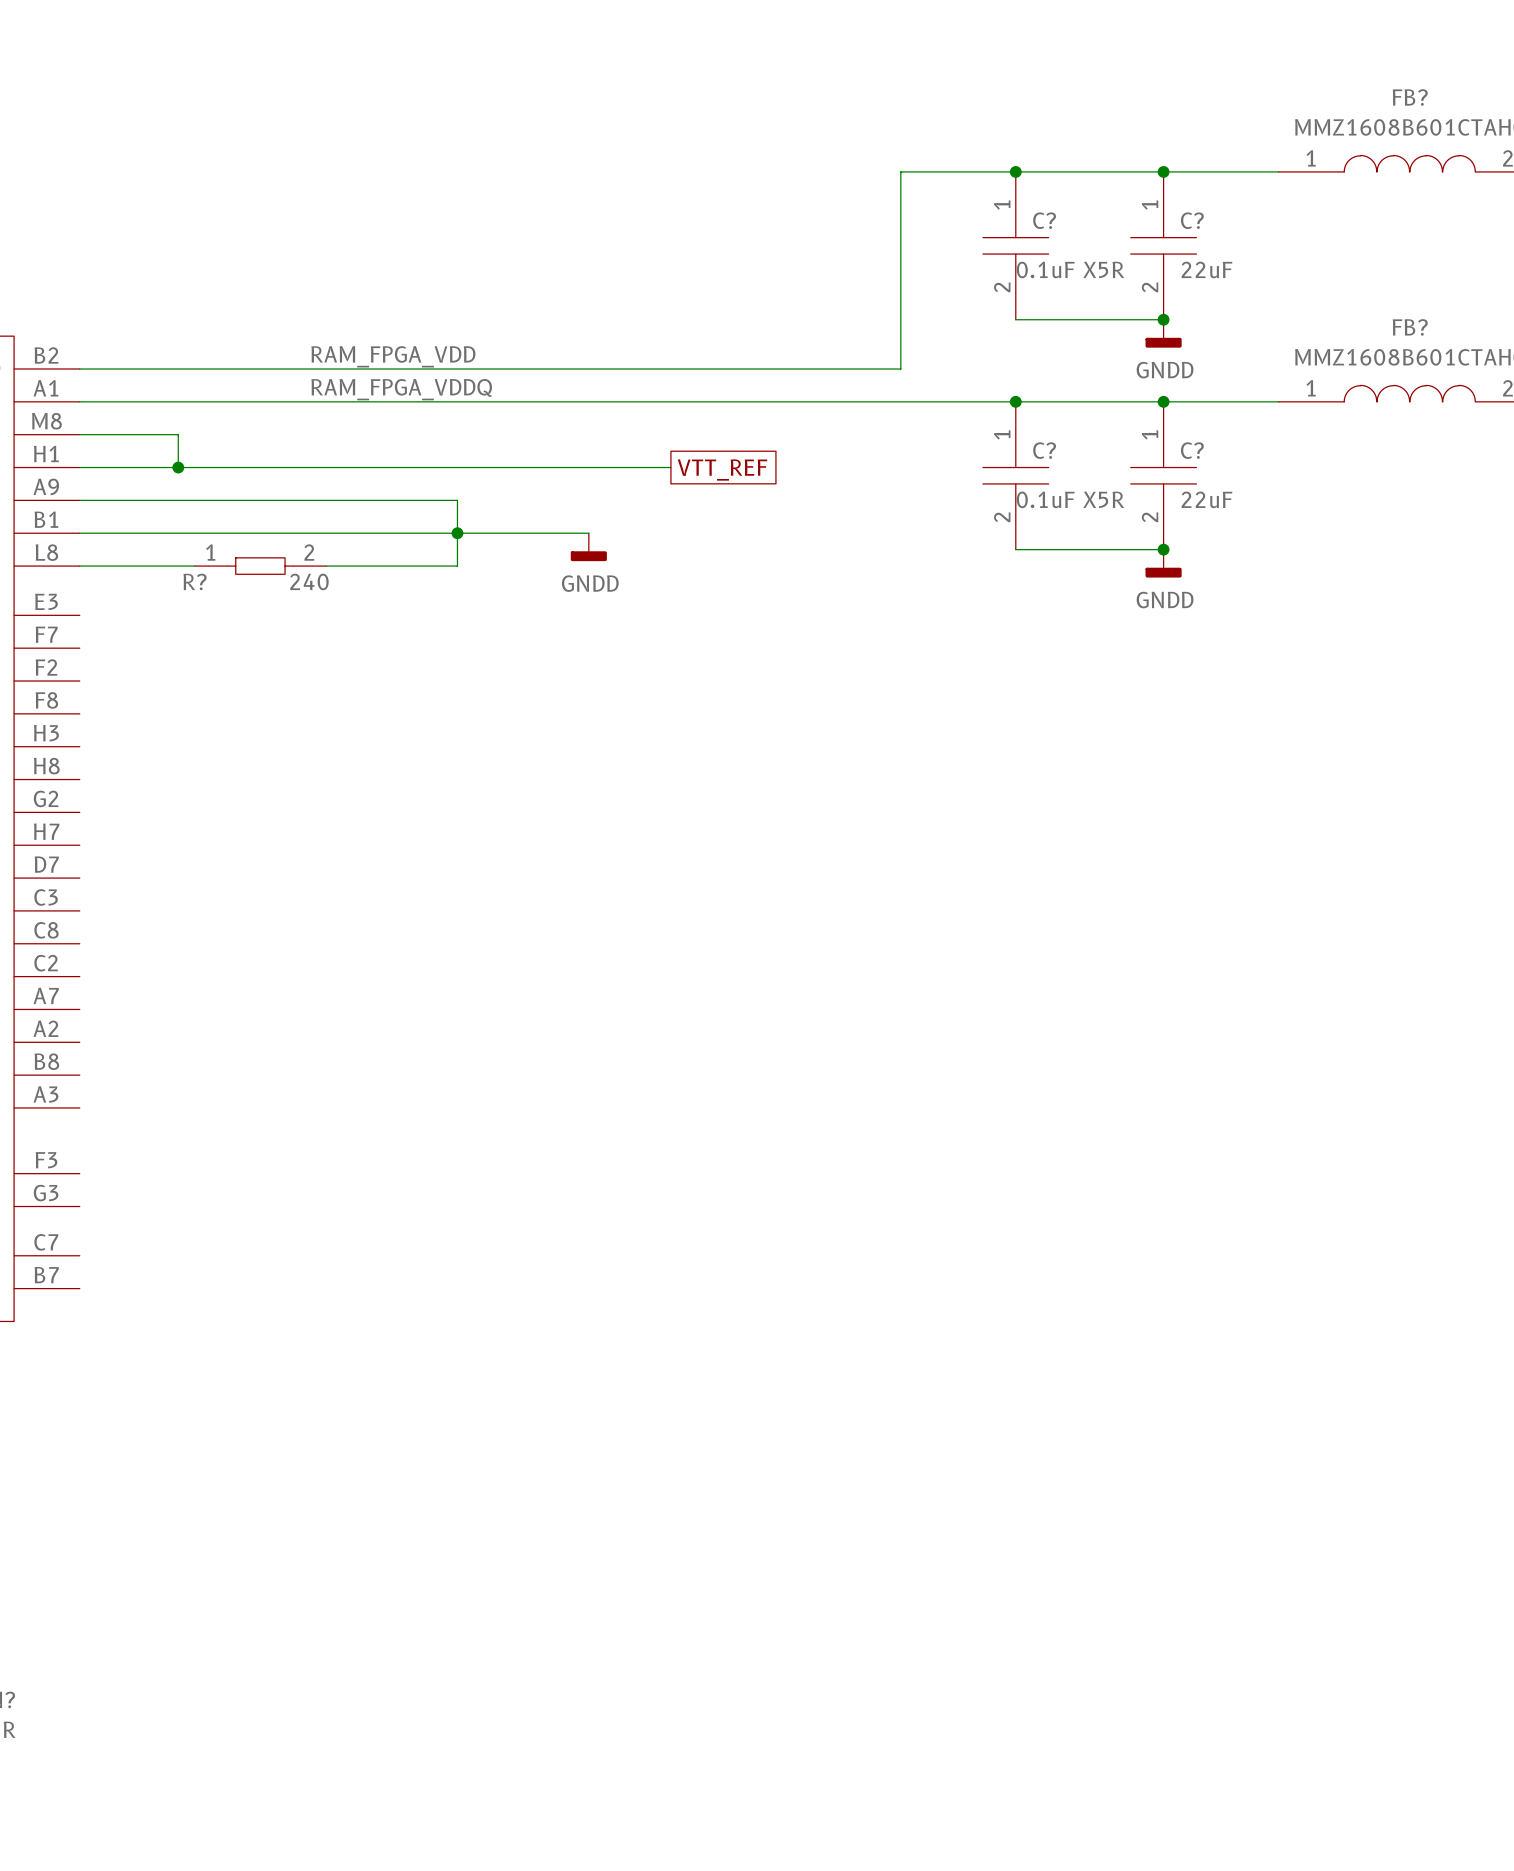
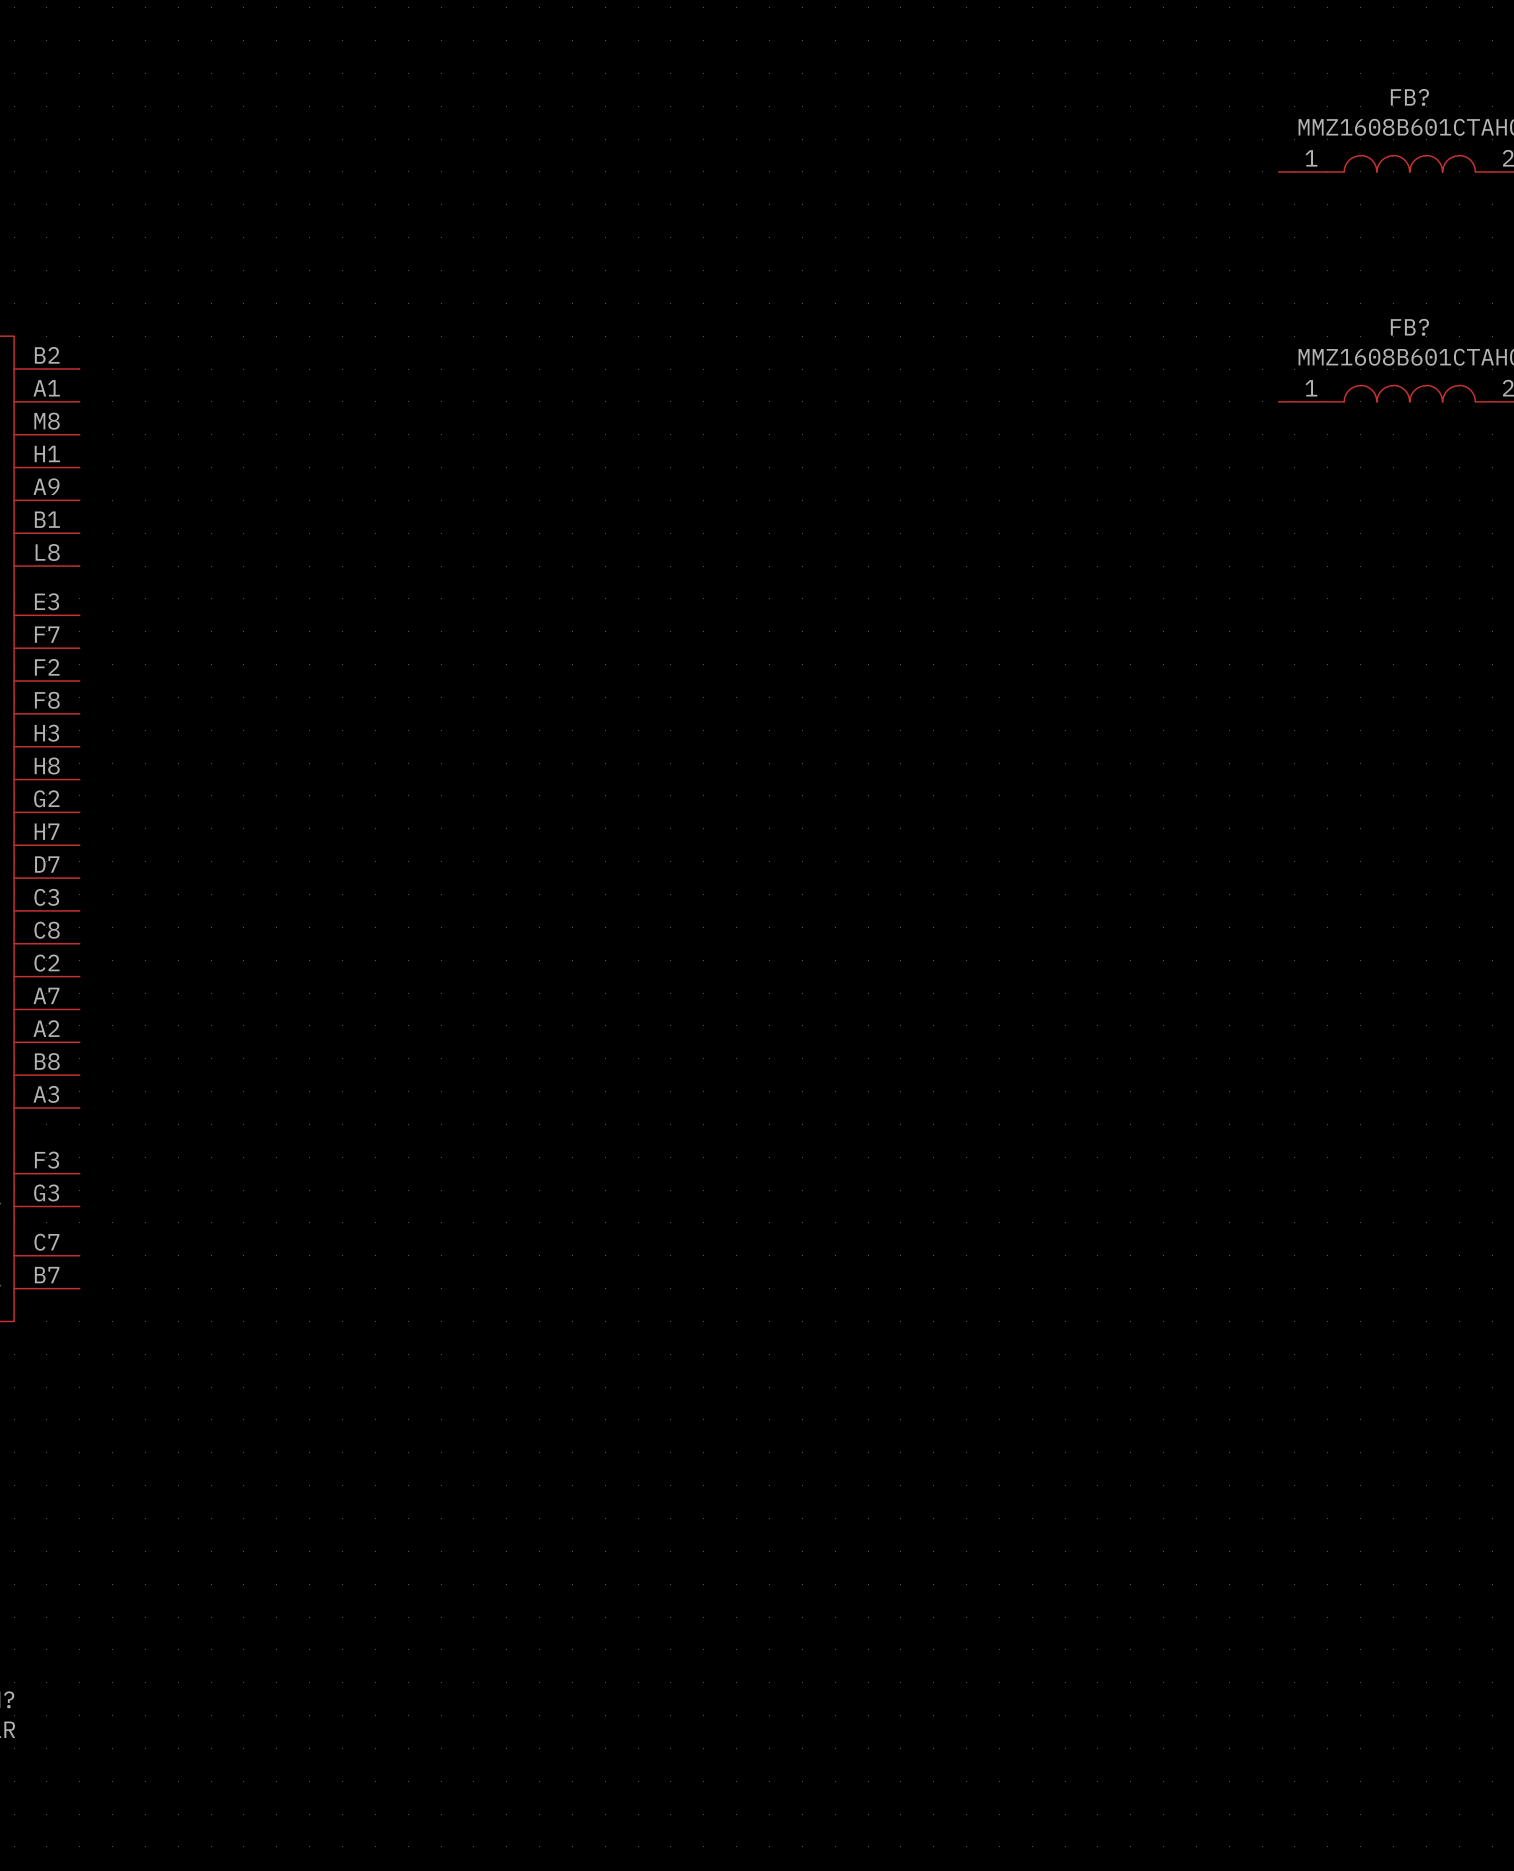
junction: (1015, 171) -> none
junction: (1163, 171) -> none
wire: (1278, 171) (900, 171) (900, 369) (79, 369) -> none
C?: (1015, 245) -> none
C?: (1163, 245) -> none
wire: (1015, 319) (1163, 319) -> none
junction: (1163, 319) -> none
power symbol: GNDD (1163, 333) -> none
label: RAM_FPGA_VDD (393, 356) -> none
label: RAM_FPGA_VDDQ (401, 389) -> none
wire: (79, 401) (1278, 401) -> none
junction: (1015, 401) -> none
junction: (1163, 401) -> none
wire: (79, 434) (178, 434) (178, 467) -> none
wire: (79, 467) (670, 467) -> none
junction: (178, 467) -> none
global label: VTT_REF (722, 469) -> none
C?: (1015, 475) -> none
C?: (1163, 475) -> none
wire: (79, 500) (457, 500) (457, 566) (326, 566) -> none
wire: (79, 533) (588, 533) -> none
junction: (457, 533) -> none
power symbol: GNDD (588, 547) -> none
wire: (1015, 549) (1163, 549) -> none
junction: (1163, 549) -> none
power symbol: GNDD (1163, 563) -> none
wire: (79, 566) (194, 566) -> none
R?: (260, 566) -> none

